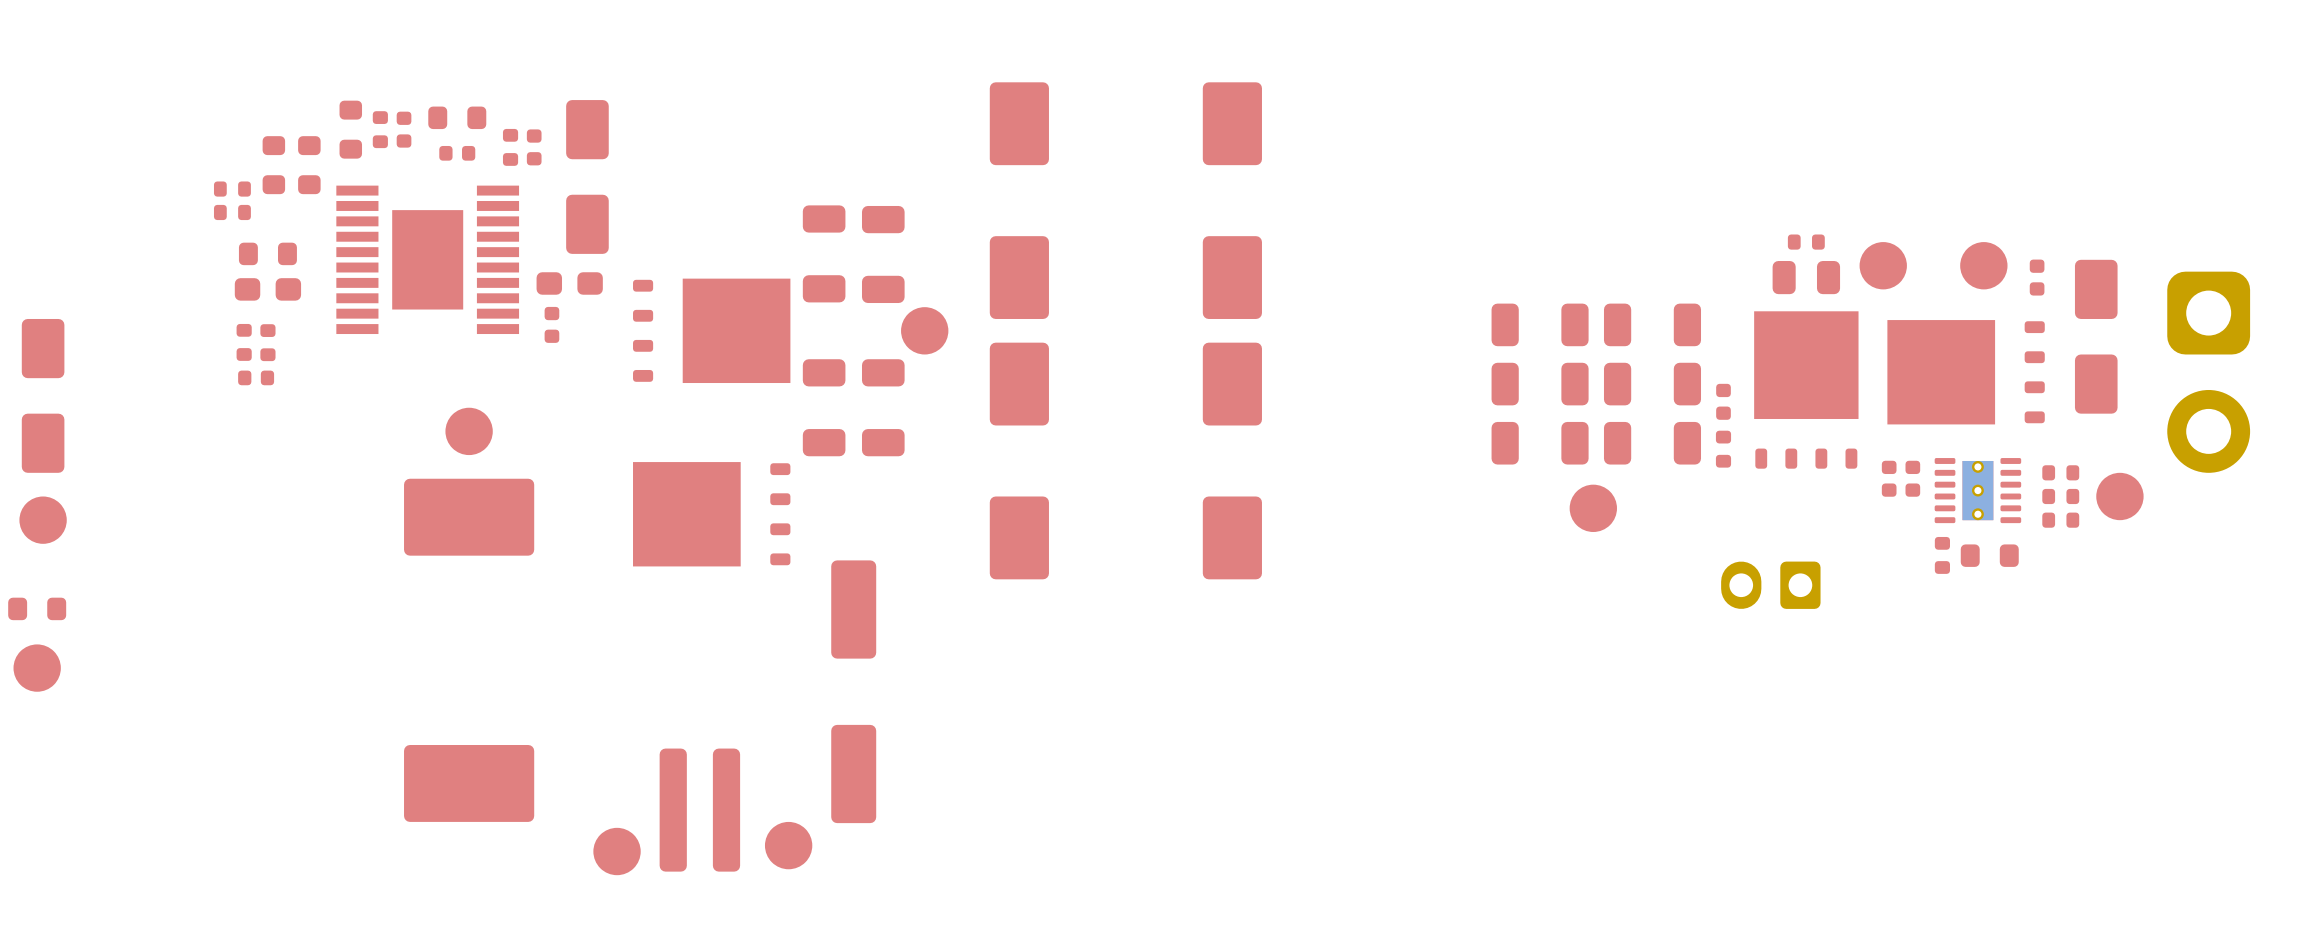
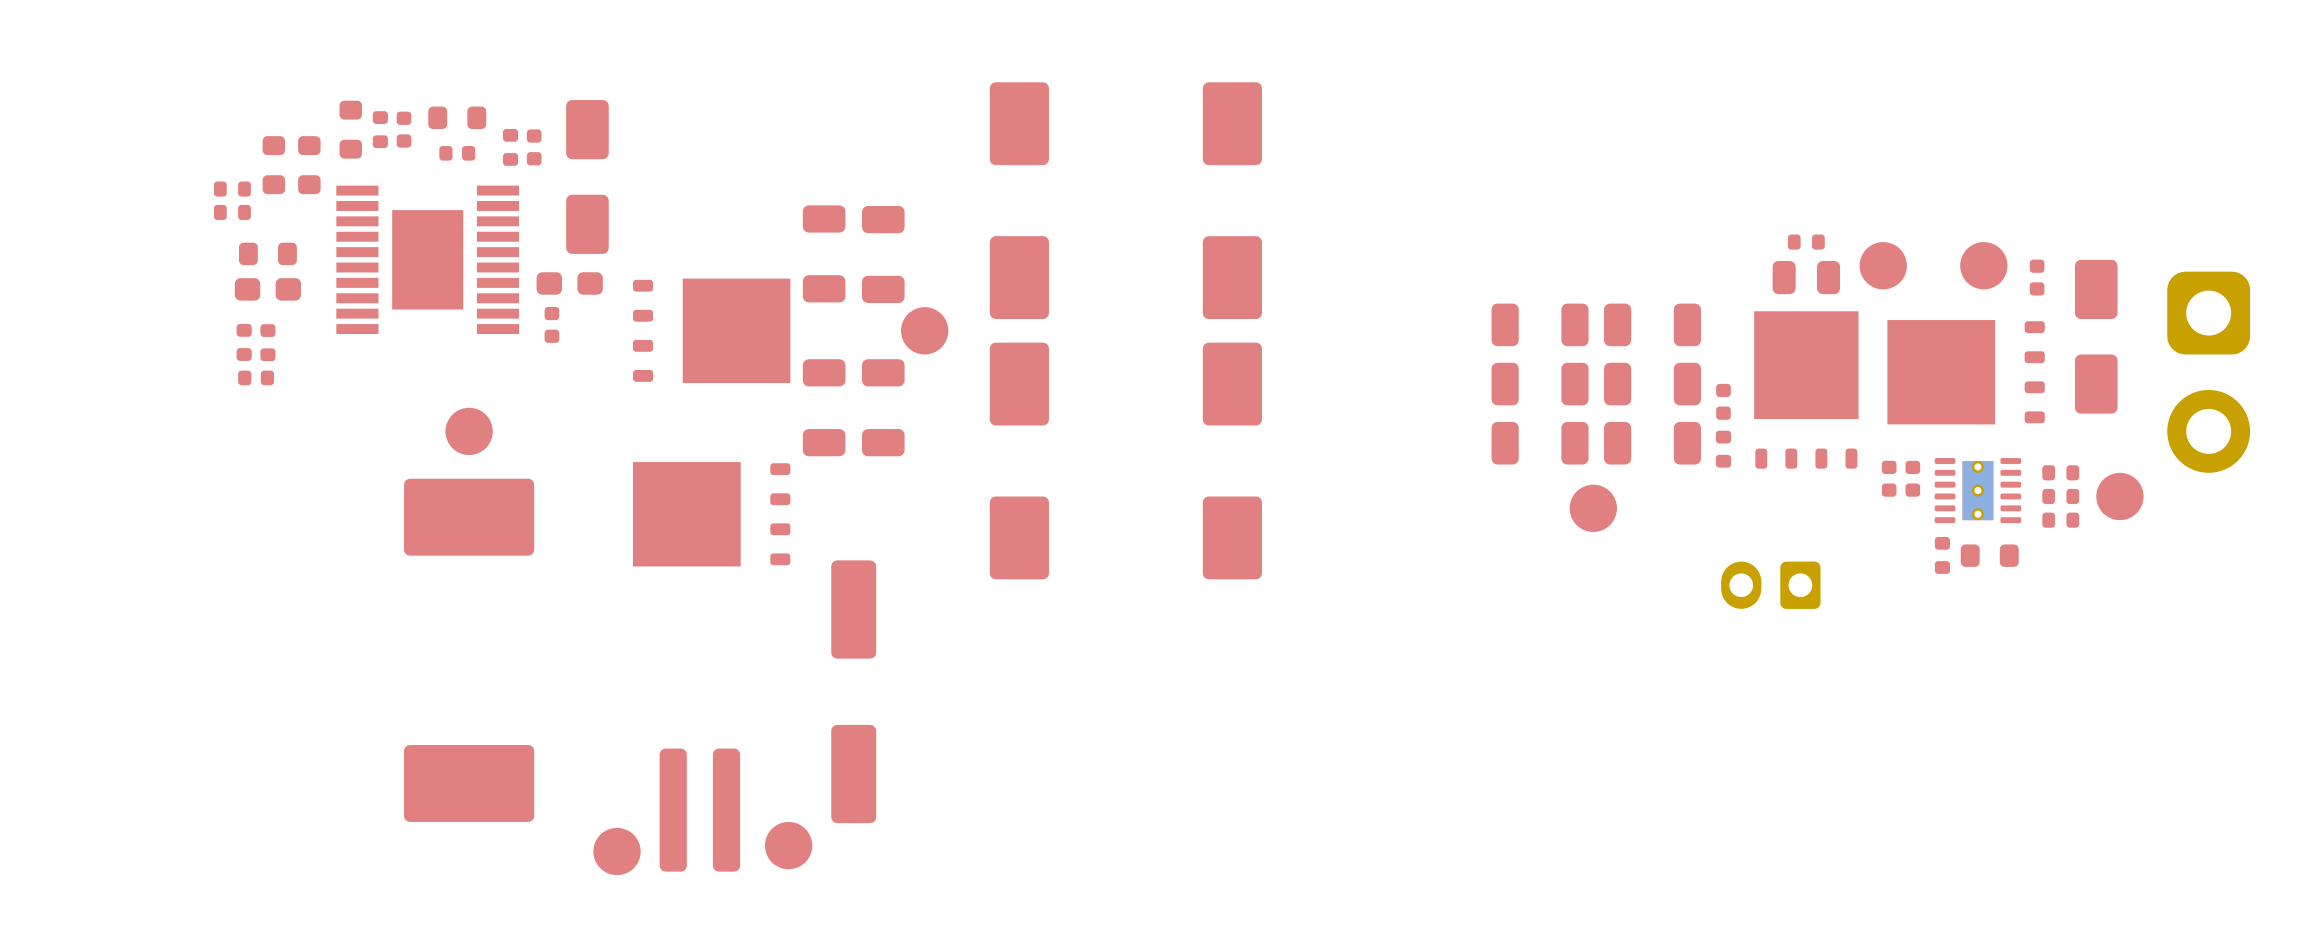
part: (43, 395) -> none
part: (43, 520) -> none
part: (37, 608) -> none
part: (37, 668) -> none

